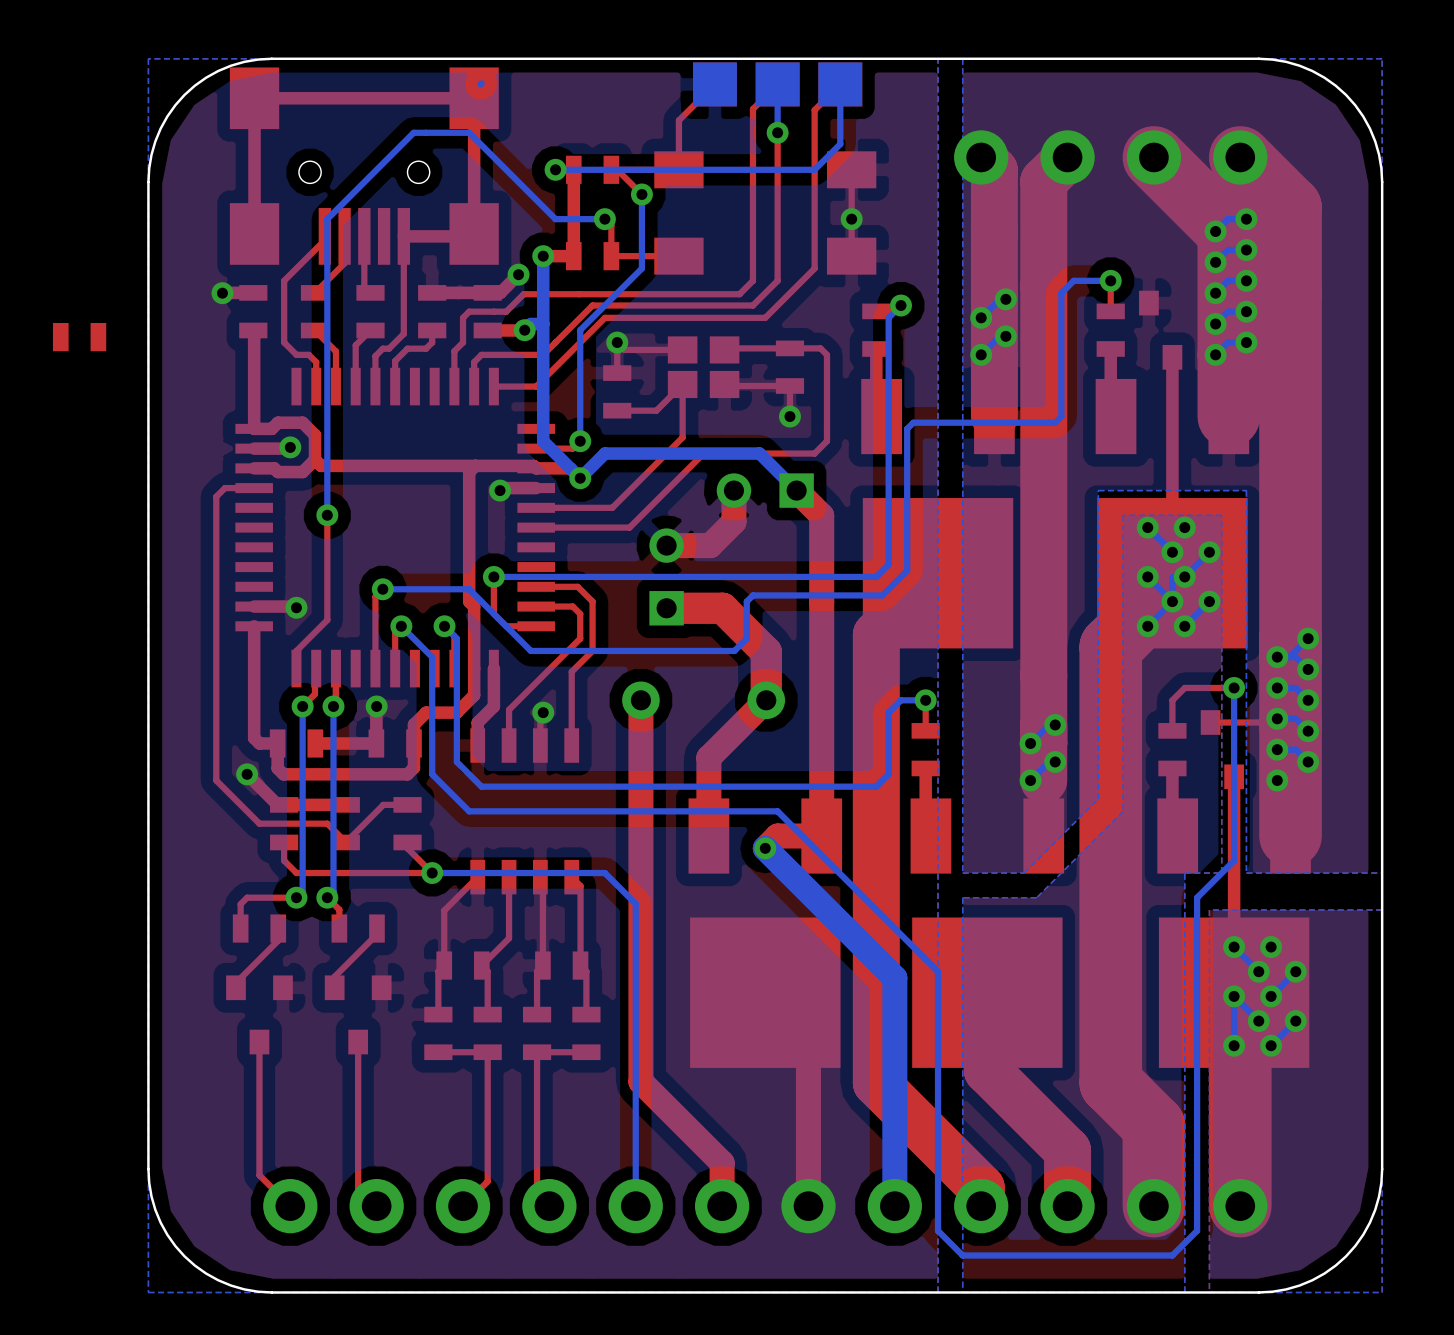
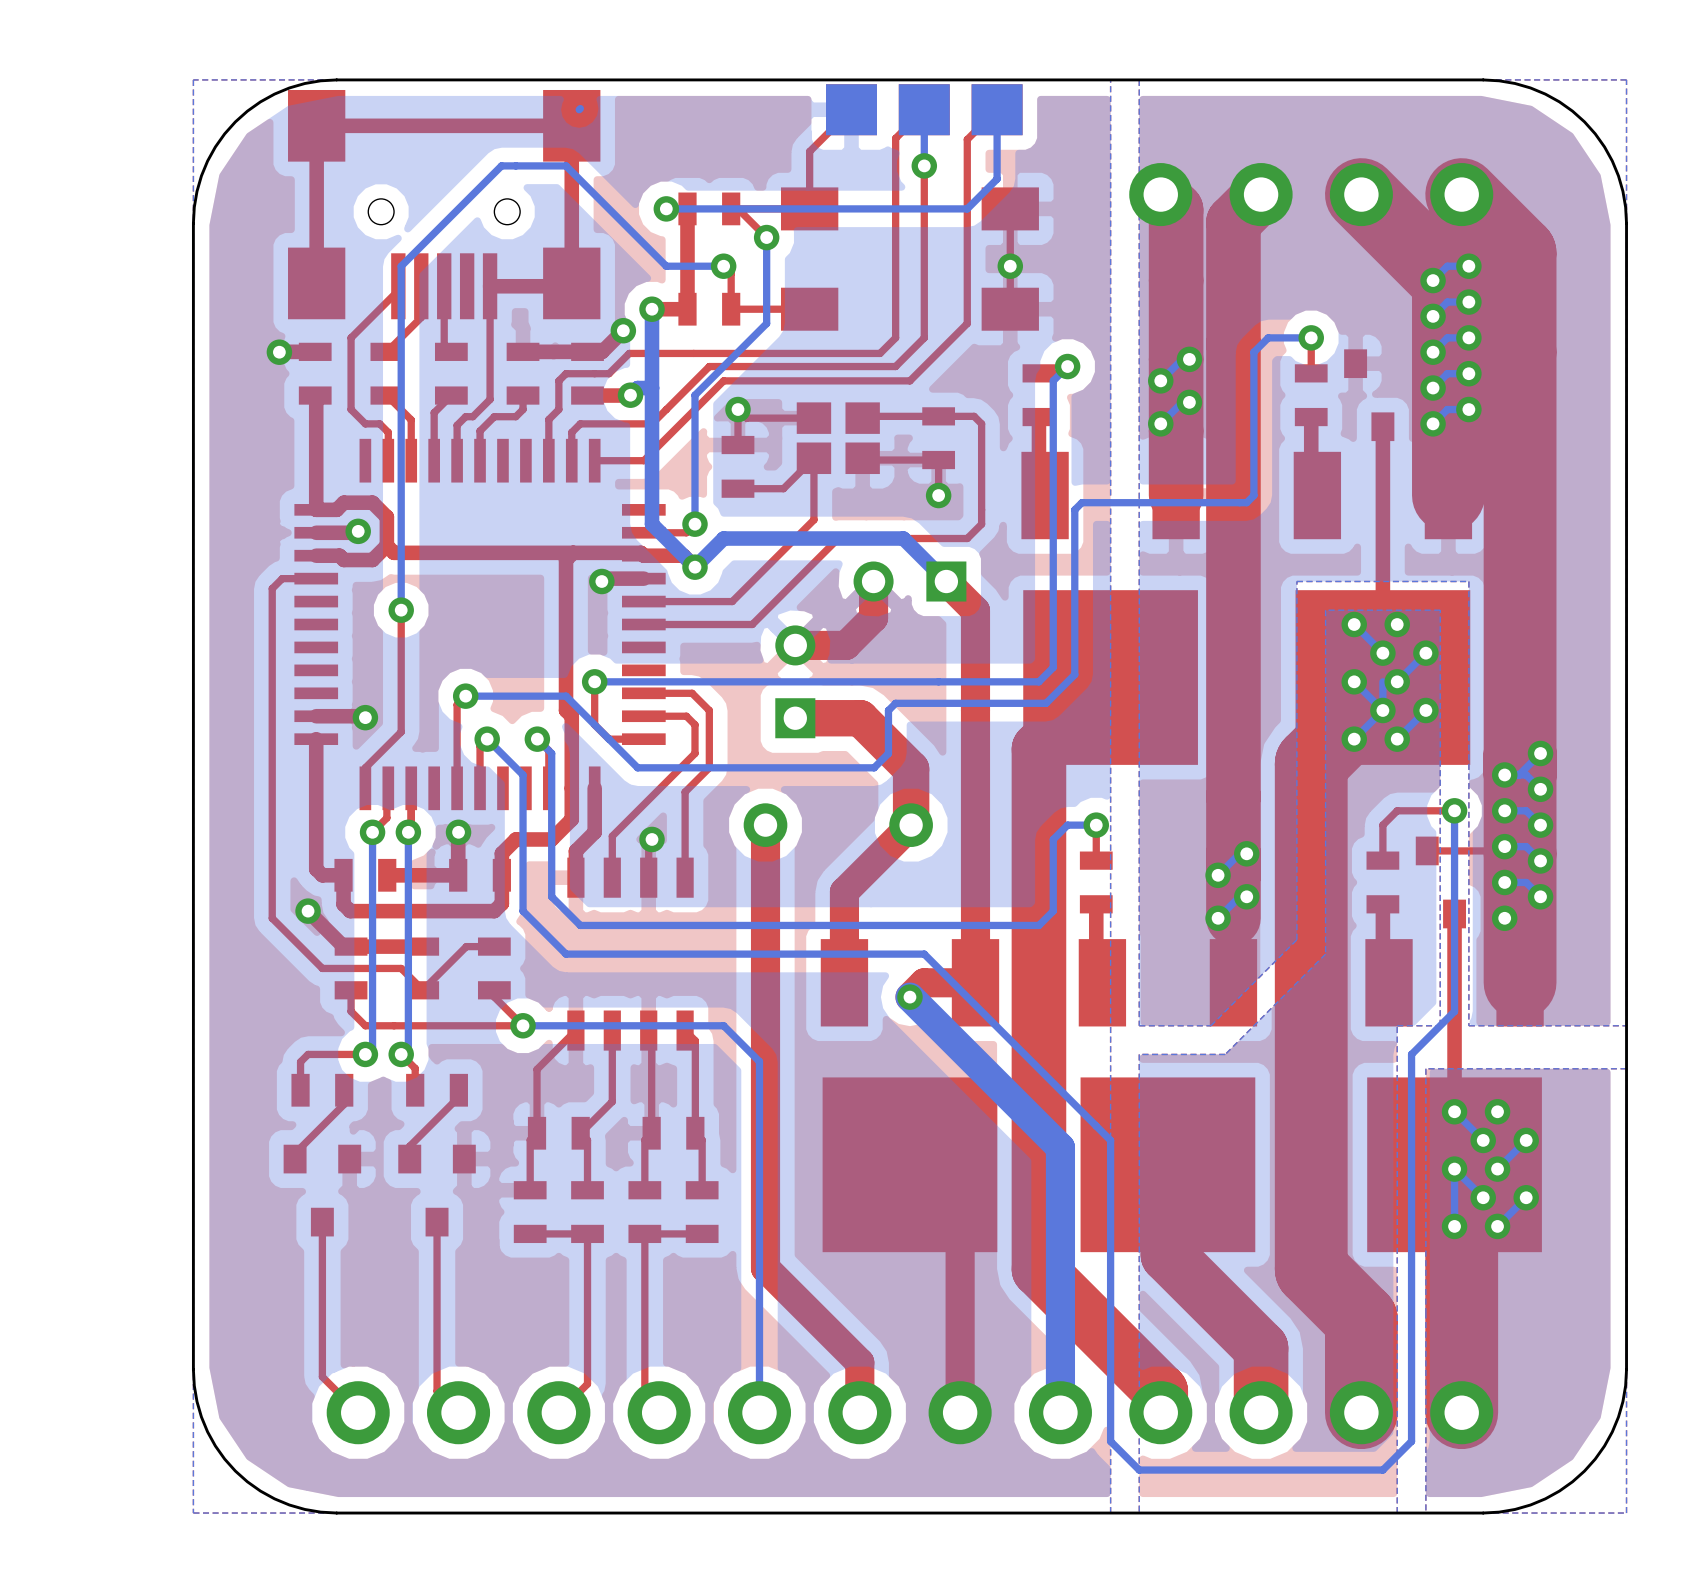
part: (79, 337) -> none

